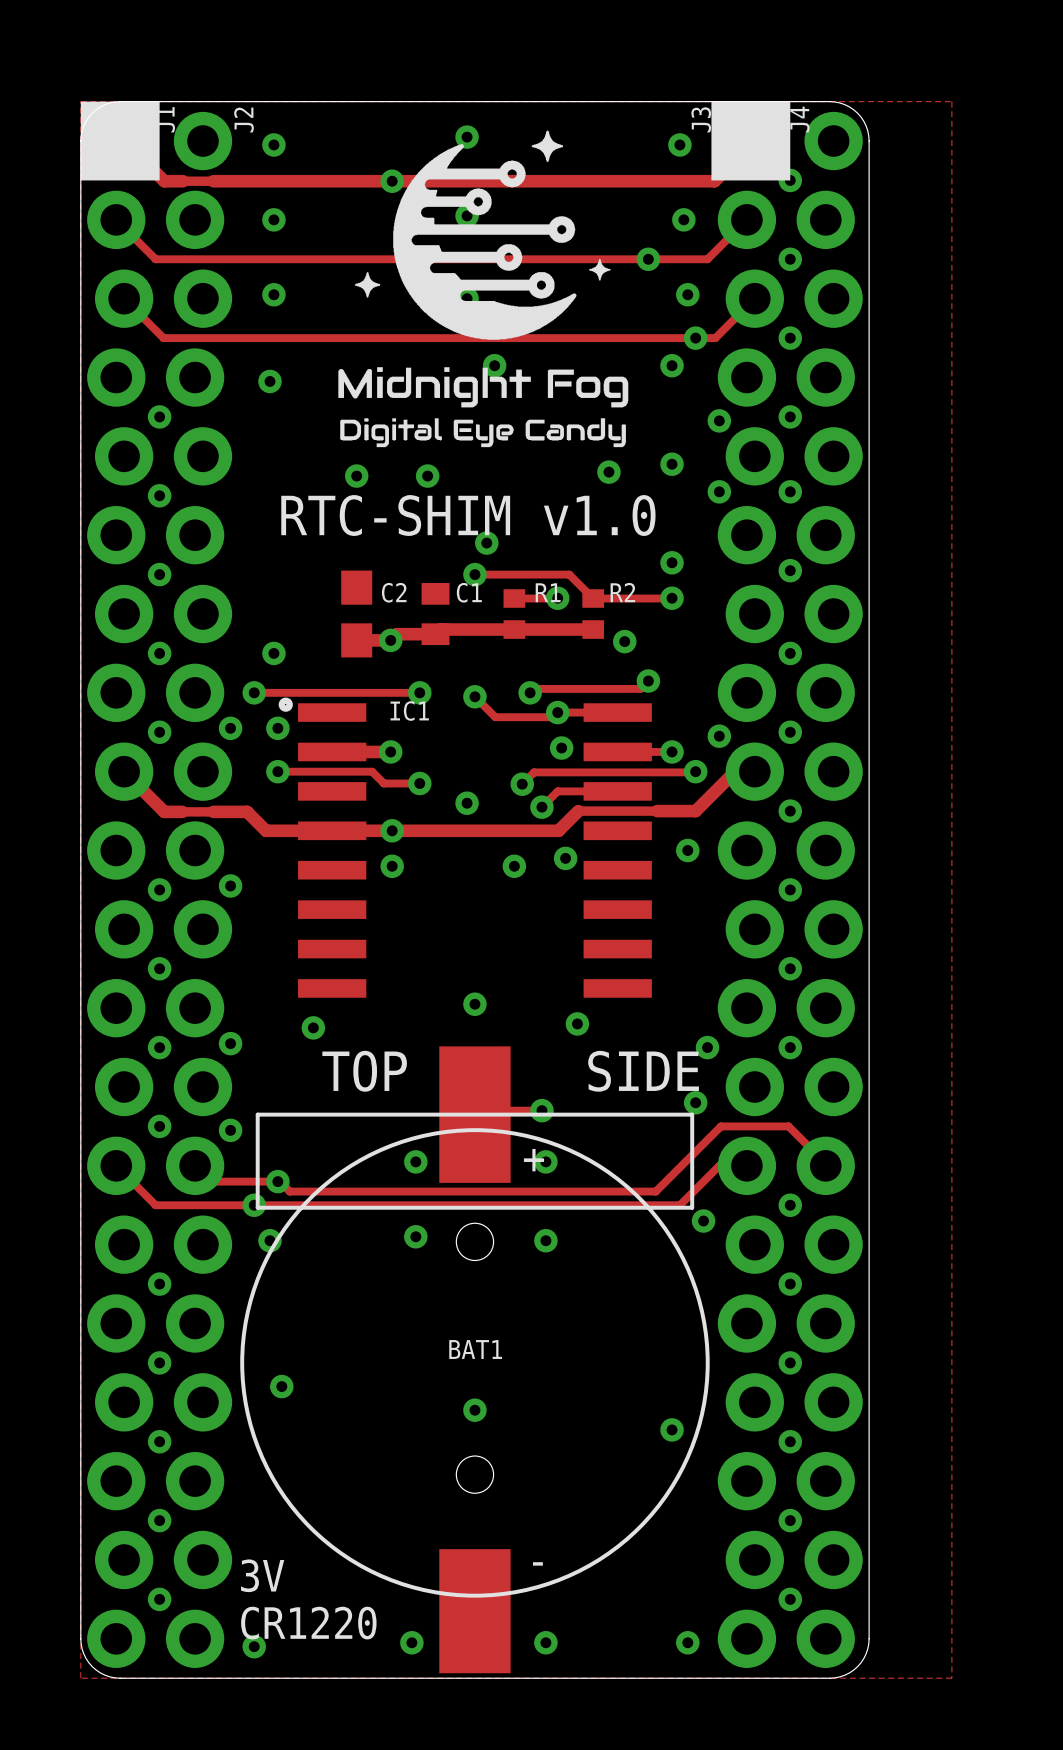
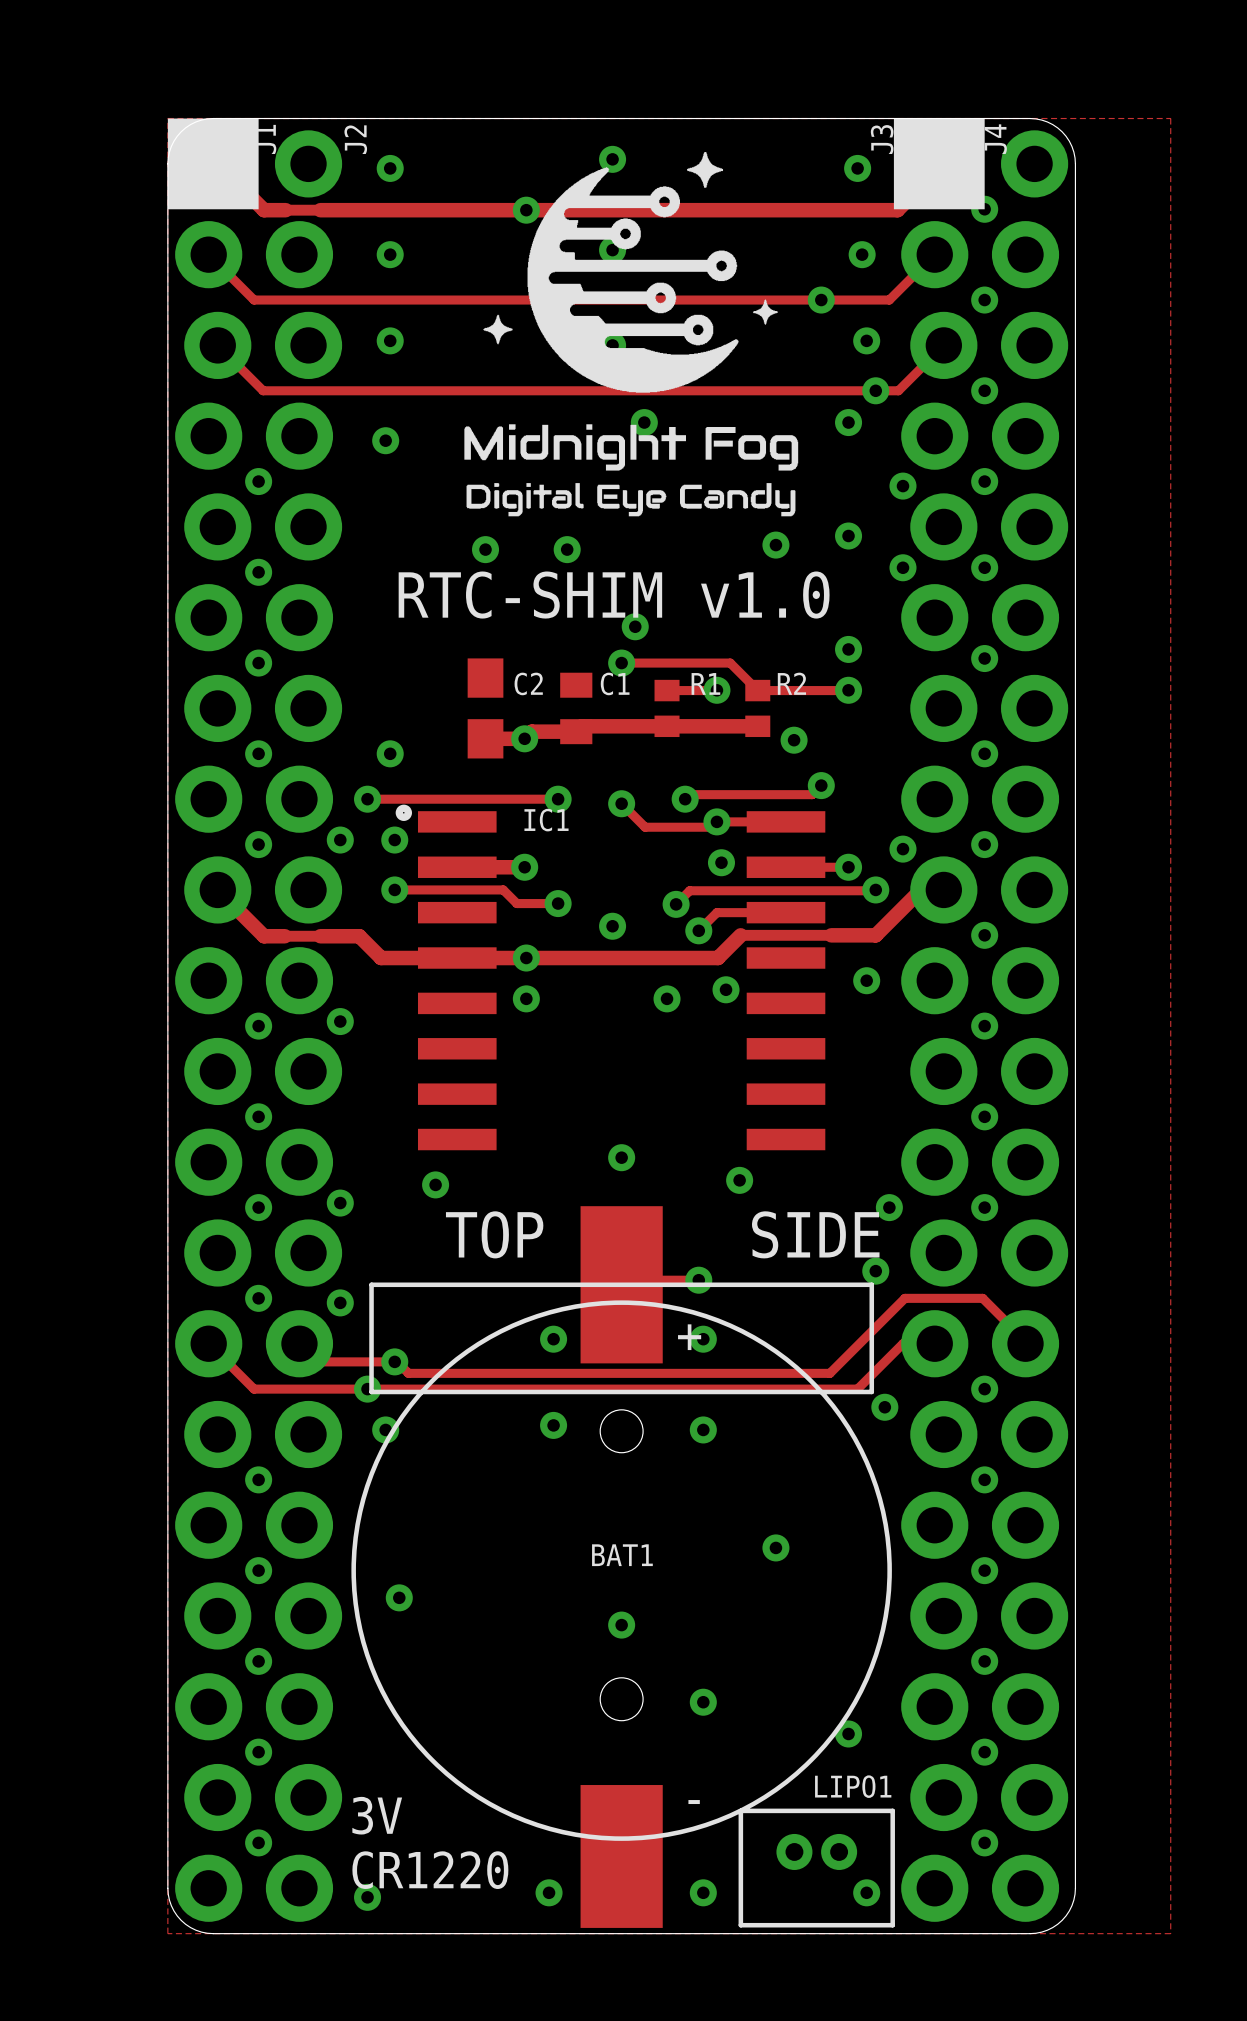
via: none -> (775, 1547)
via: (672, 1429) -> none
via: none -> (703, 1702)
via: none -> (848, 1733)
LIPO1: none -> (816, 1868)

